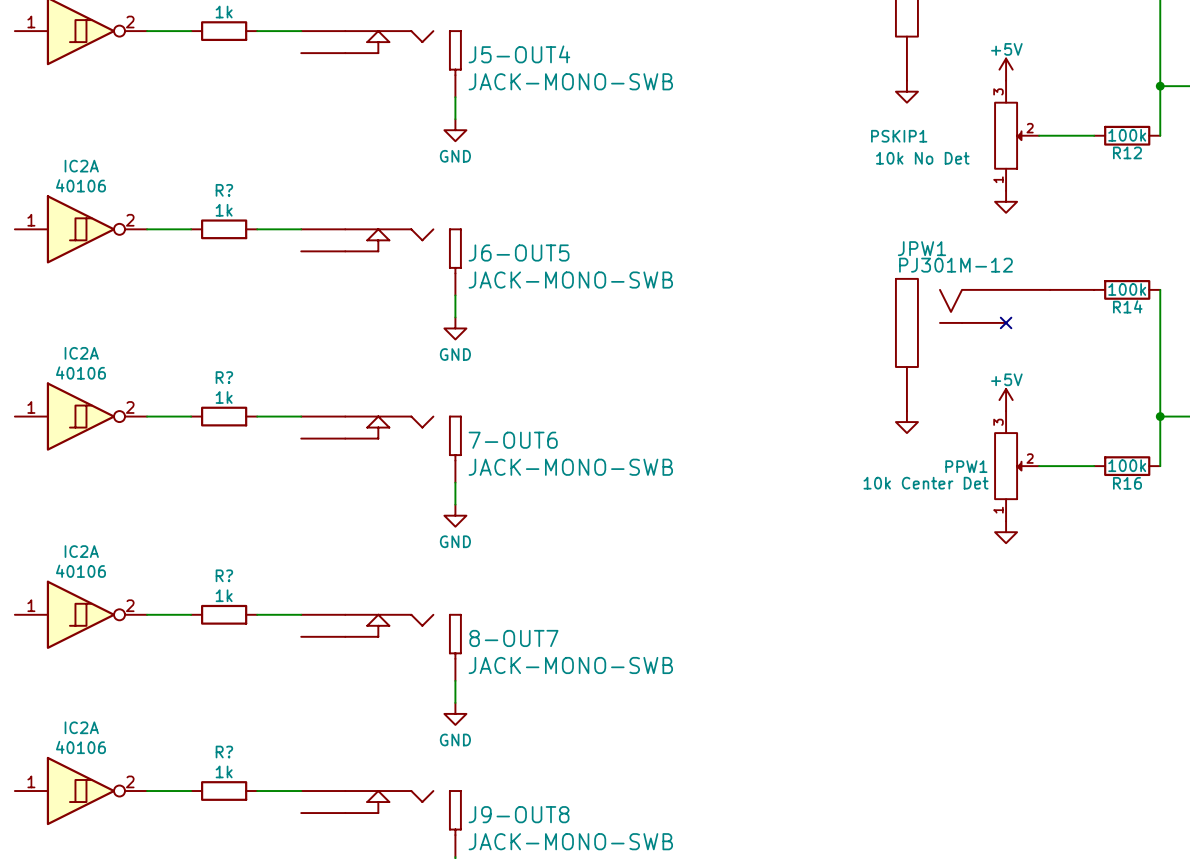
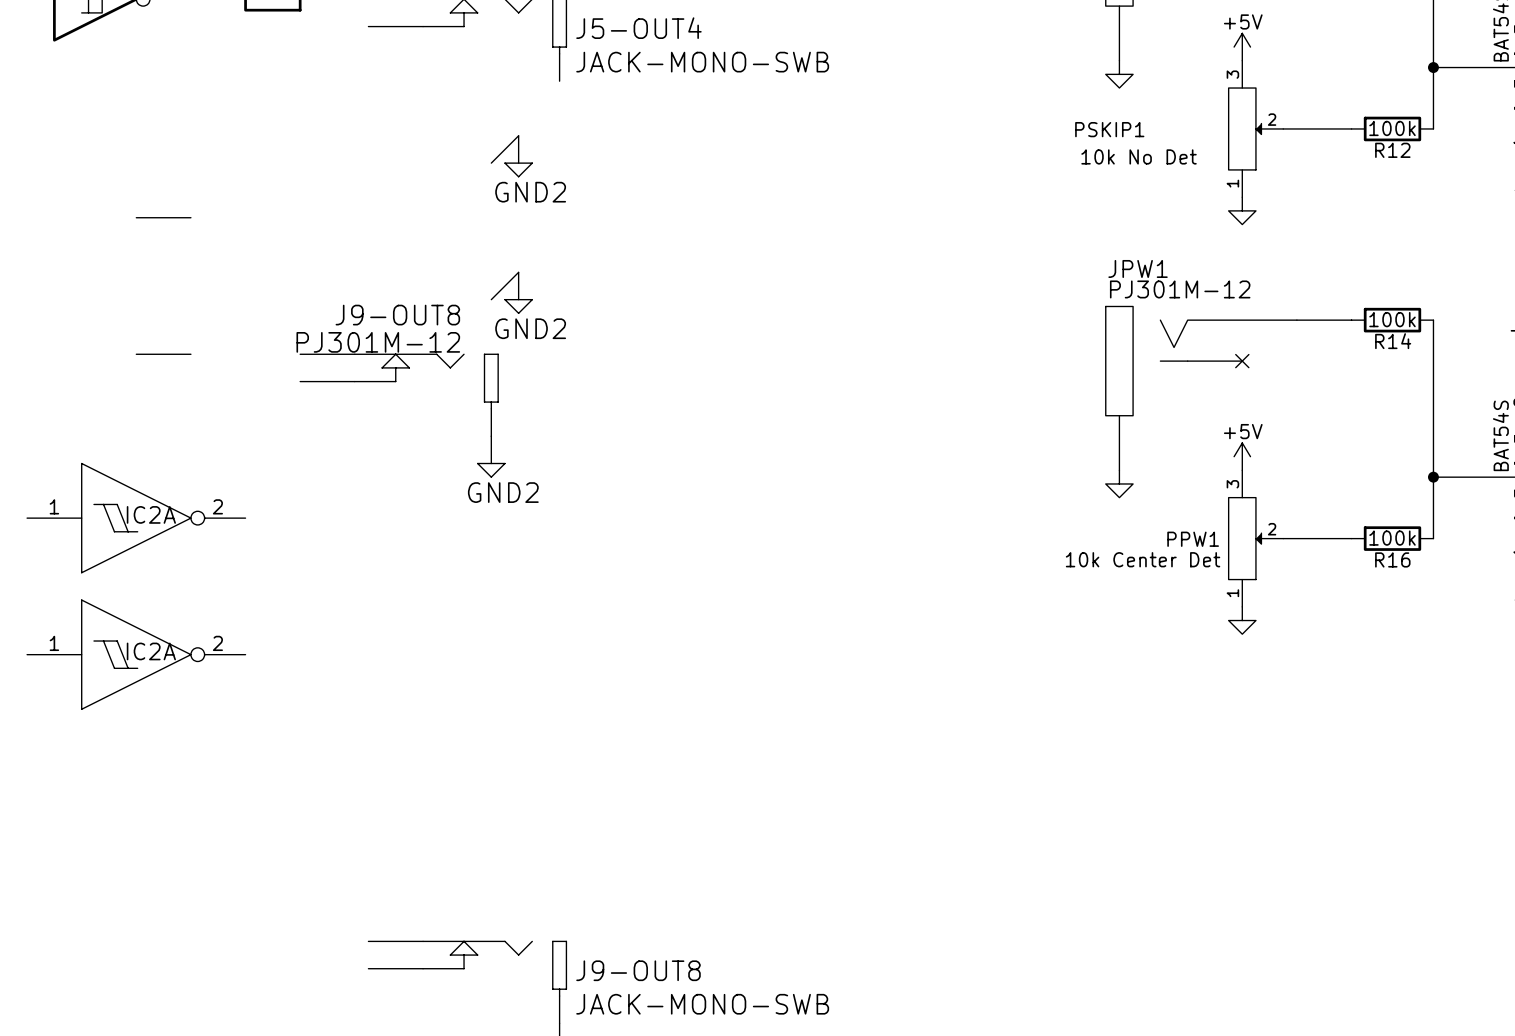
wire: (455, 97) (455, 119) -> none
power symbol: GND (455, 130) -> none
wire: none -> (518, 135) (491, 163)
power symbol: none -> GND2 (518, 156)
IC2A: 40106 (80, 229) -> none
wire: (147, 229) (191, 229) -> (136, 217) (190, 217)
R?: (224, 229) -> none
wire: (257, 229) (301, 229) -> none
wire: none -> (518, 272) (491, 299)
J6-OUT5: JACK-MONO-SWB (381, 262) -> none
power symbol: none -> GND2 (518, 292)
wire: (455, 295) (455, 317) -> none
power symbol: GND (455, 328) -> none
J9-OUT8: none -> PJ301M-12 (399, 395)
power symbol: none -> GND2 (491, 456)
IC2A: 40106 (80, 416) -> none
wire: (147, 416) (191, 416) -> (136, 354) (190, 354)
R?: (224, 416) -> none
wire: (257, 416) (301, 416) -> none
IC2A: none -> (136, 518)
7-OUT6: JACK-MONO-SWB (381, 449) -> none
wire: (455, 482) (455, 504) -> none
power symbol: GND (455, 515) -> none
IC2A: none -> (136, 654)
IC2A: 40106 (80, 614) -> none
wire: (147, 614) (191, 614) -> none
R?: (224, 614) -> none
wire: (257, 614) (301, 614) -> none
8-OUT7: JACK-MONO-SWB (381, 647) -> none
wire: (455, 680) (455, 702) -> none
power symbol: GND (455, 713) -> none
IC2A: 40106 (80, 791) -> none
wire: (147, 791) (191, 791) -> none
R?: (224, 791) -> none
wire: (257, 791) (301, 791) -> none

